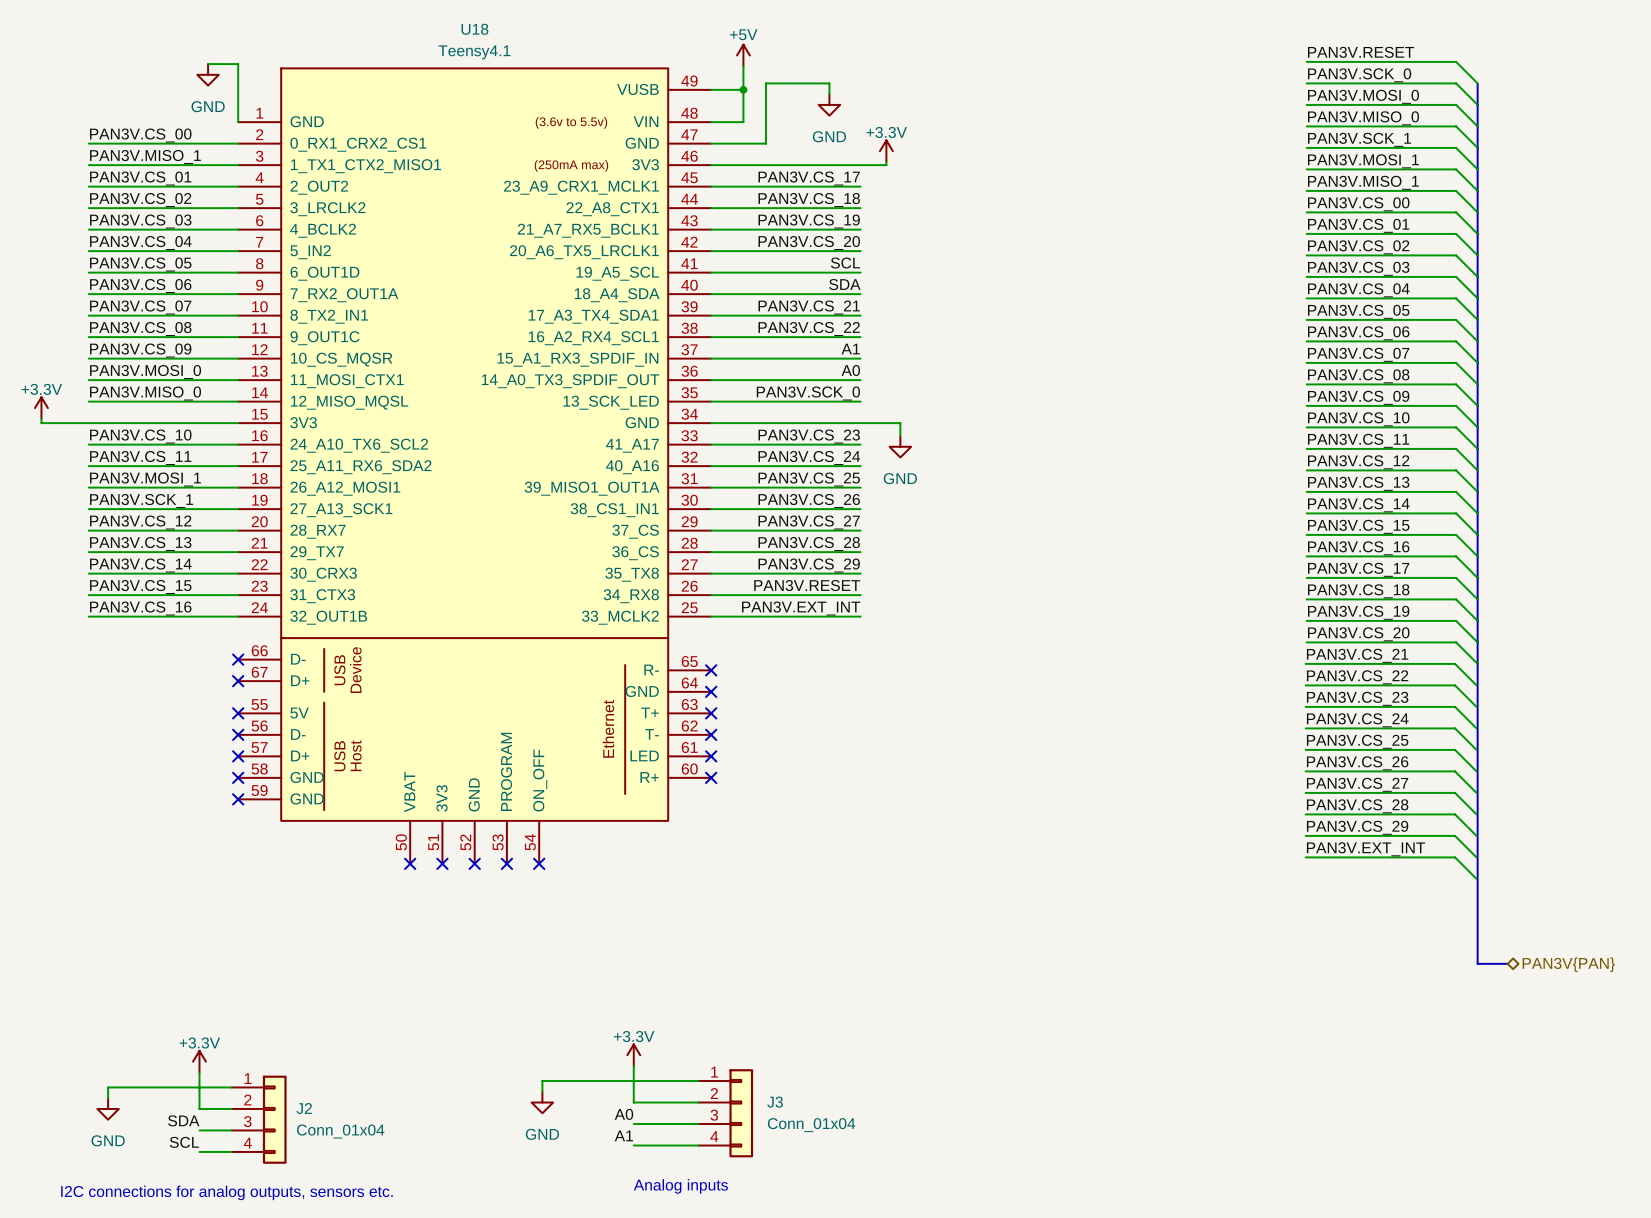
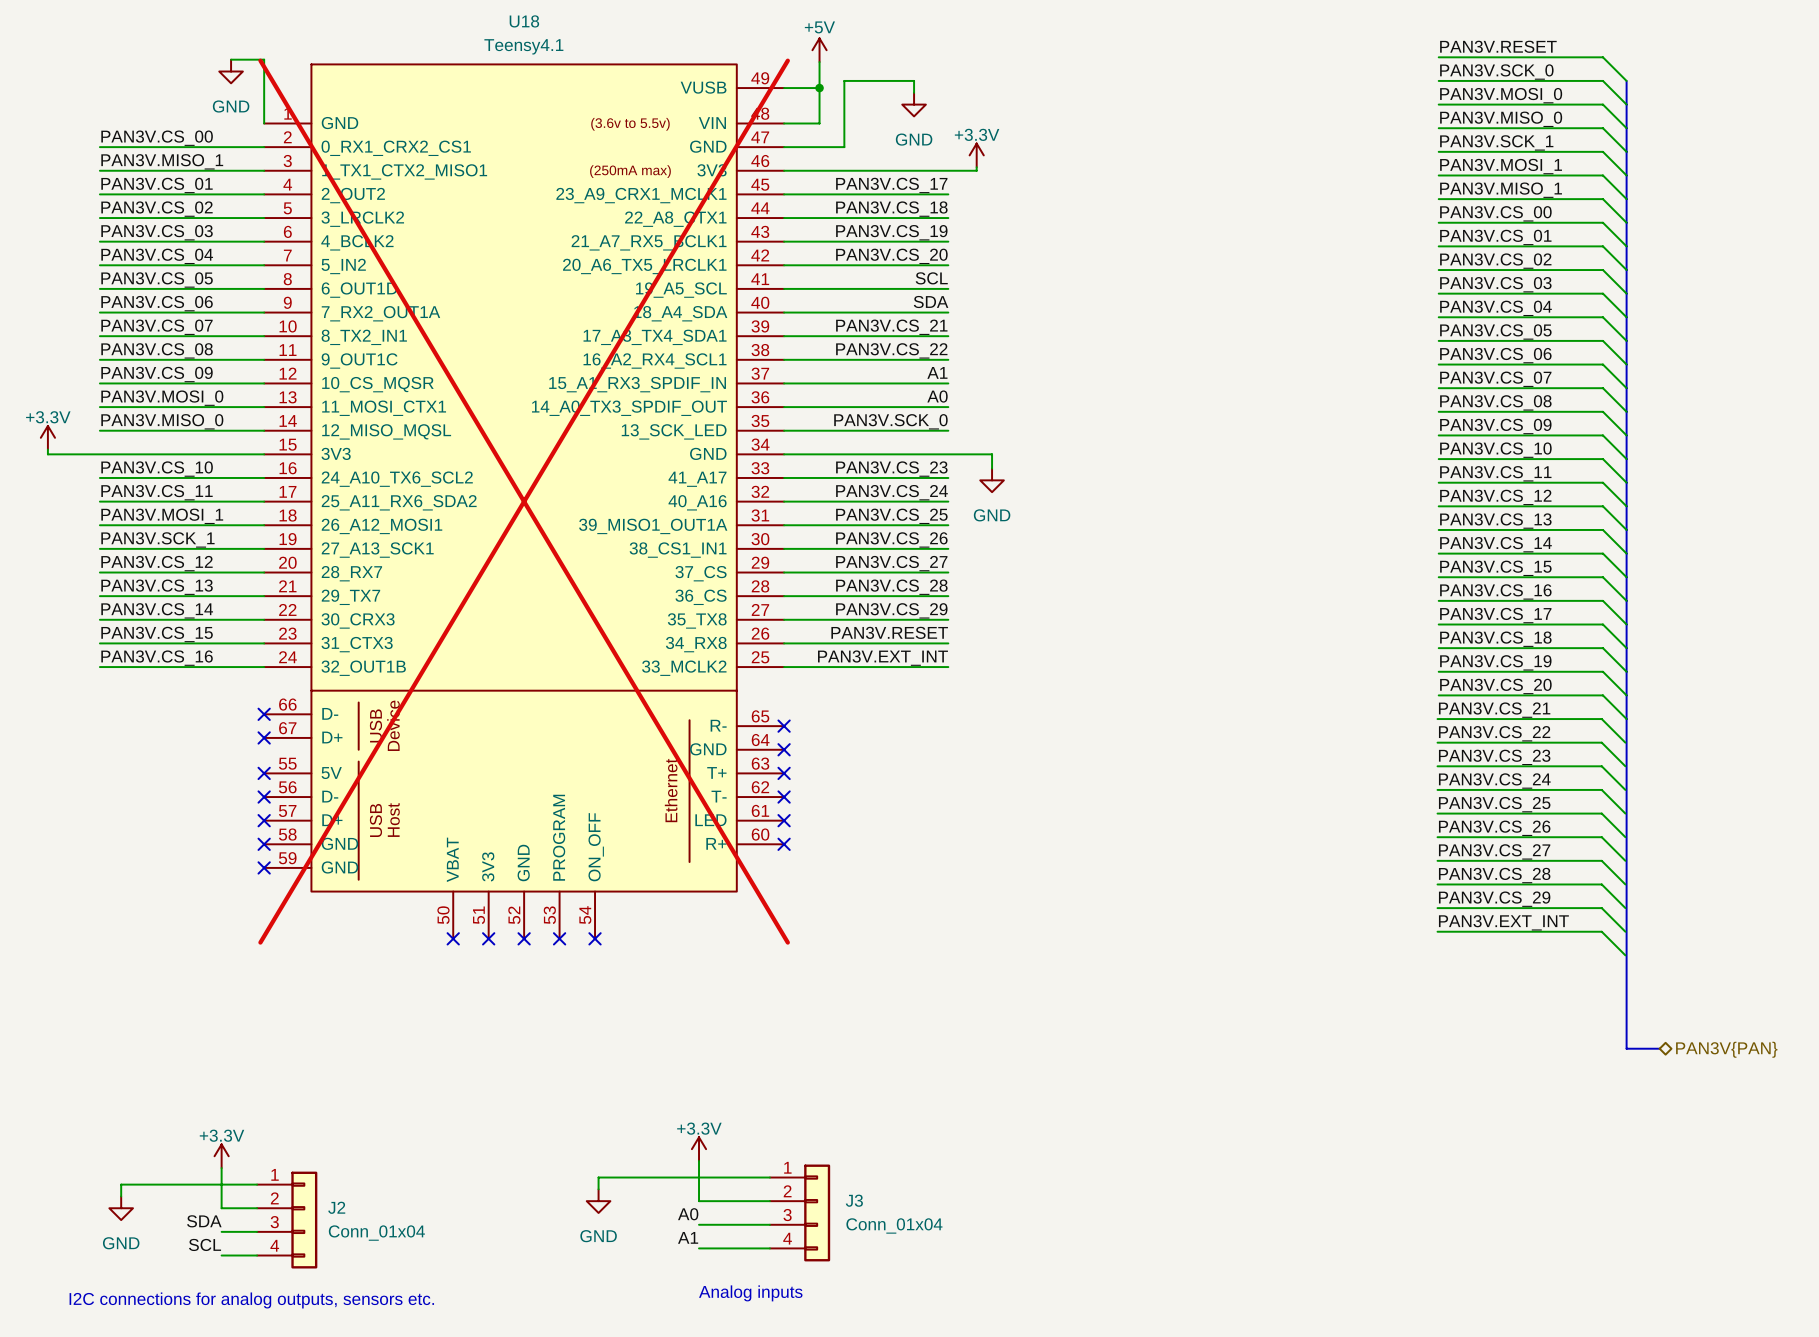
U18 do-not-place cross: none -> (524, 501)

